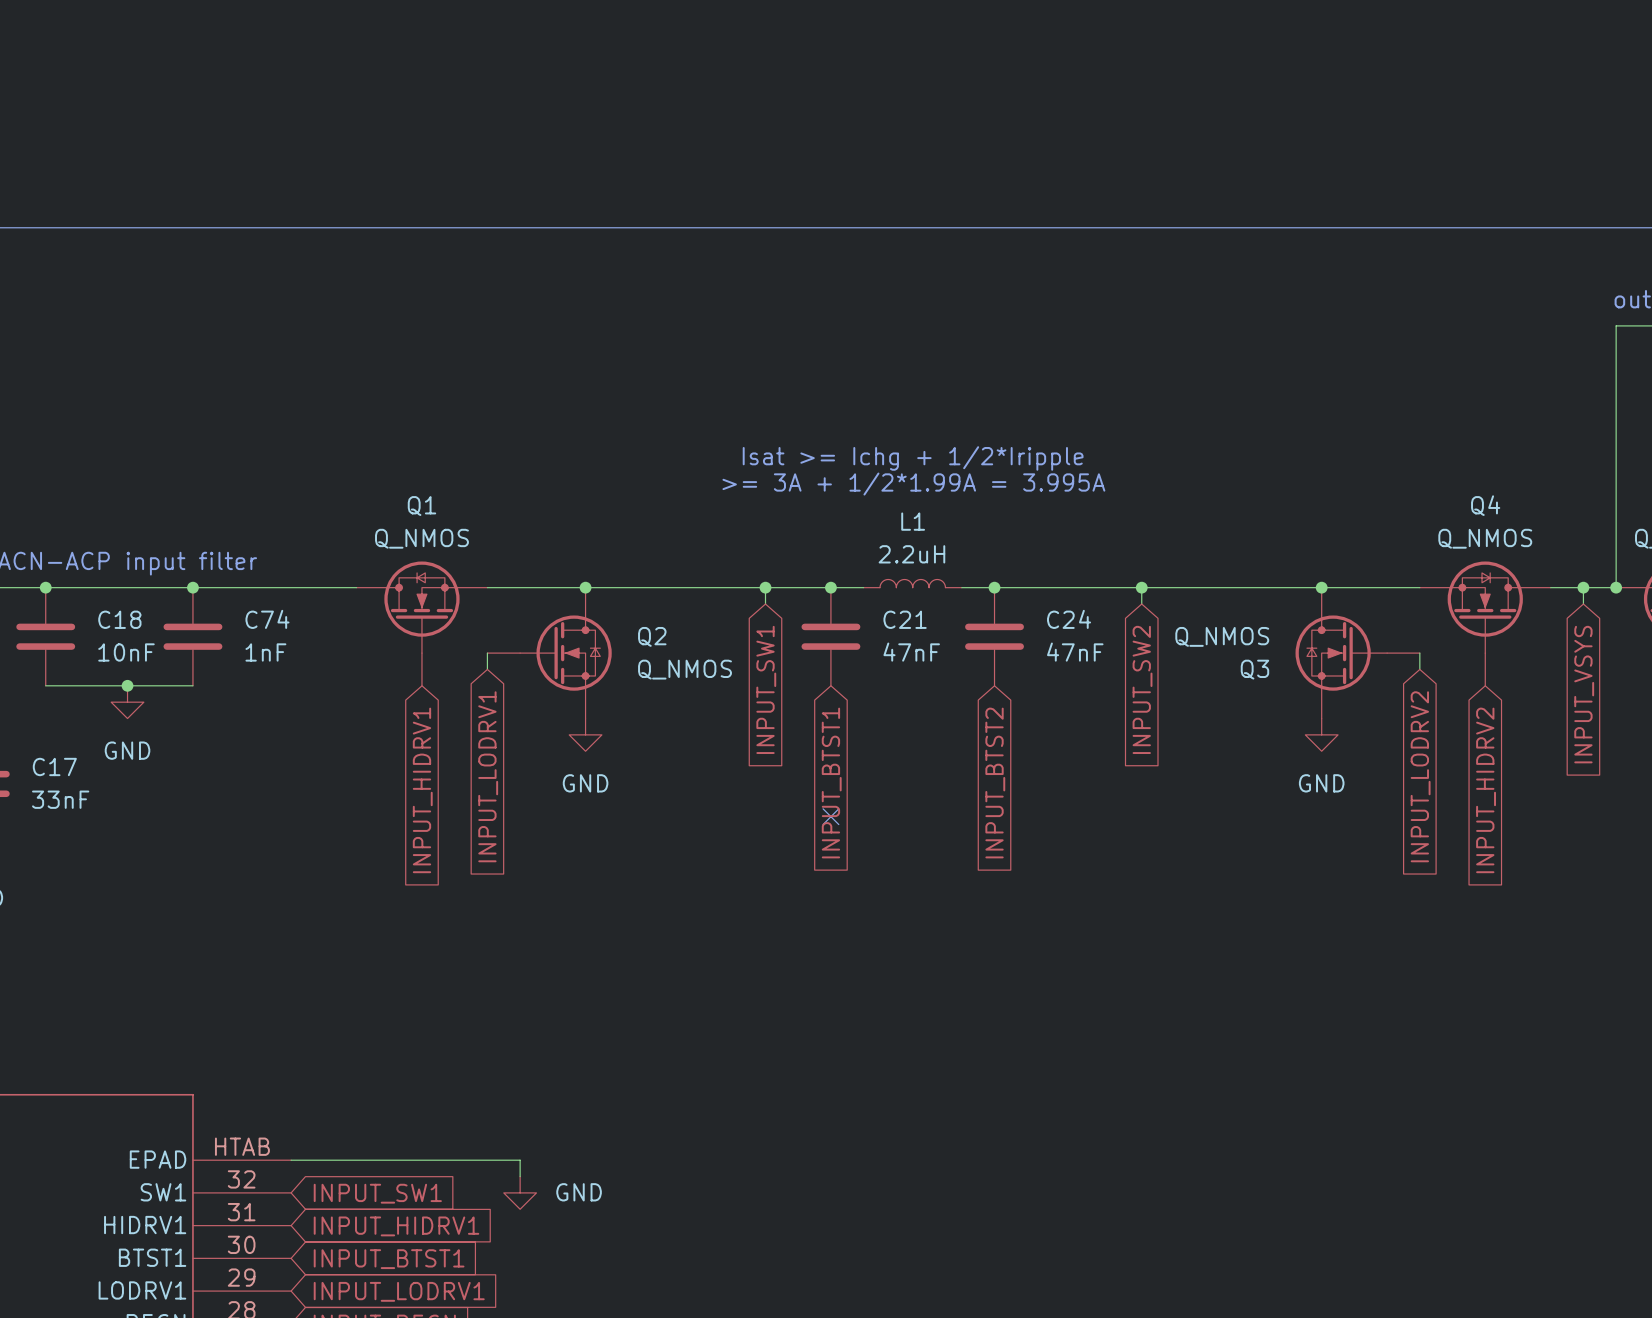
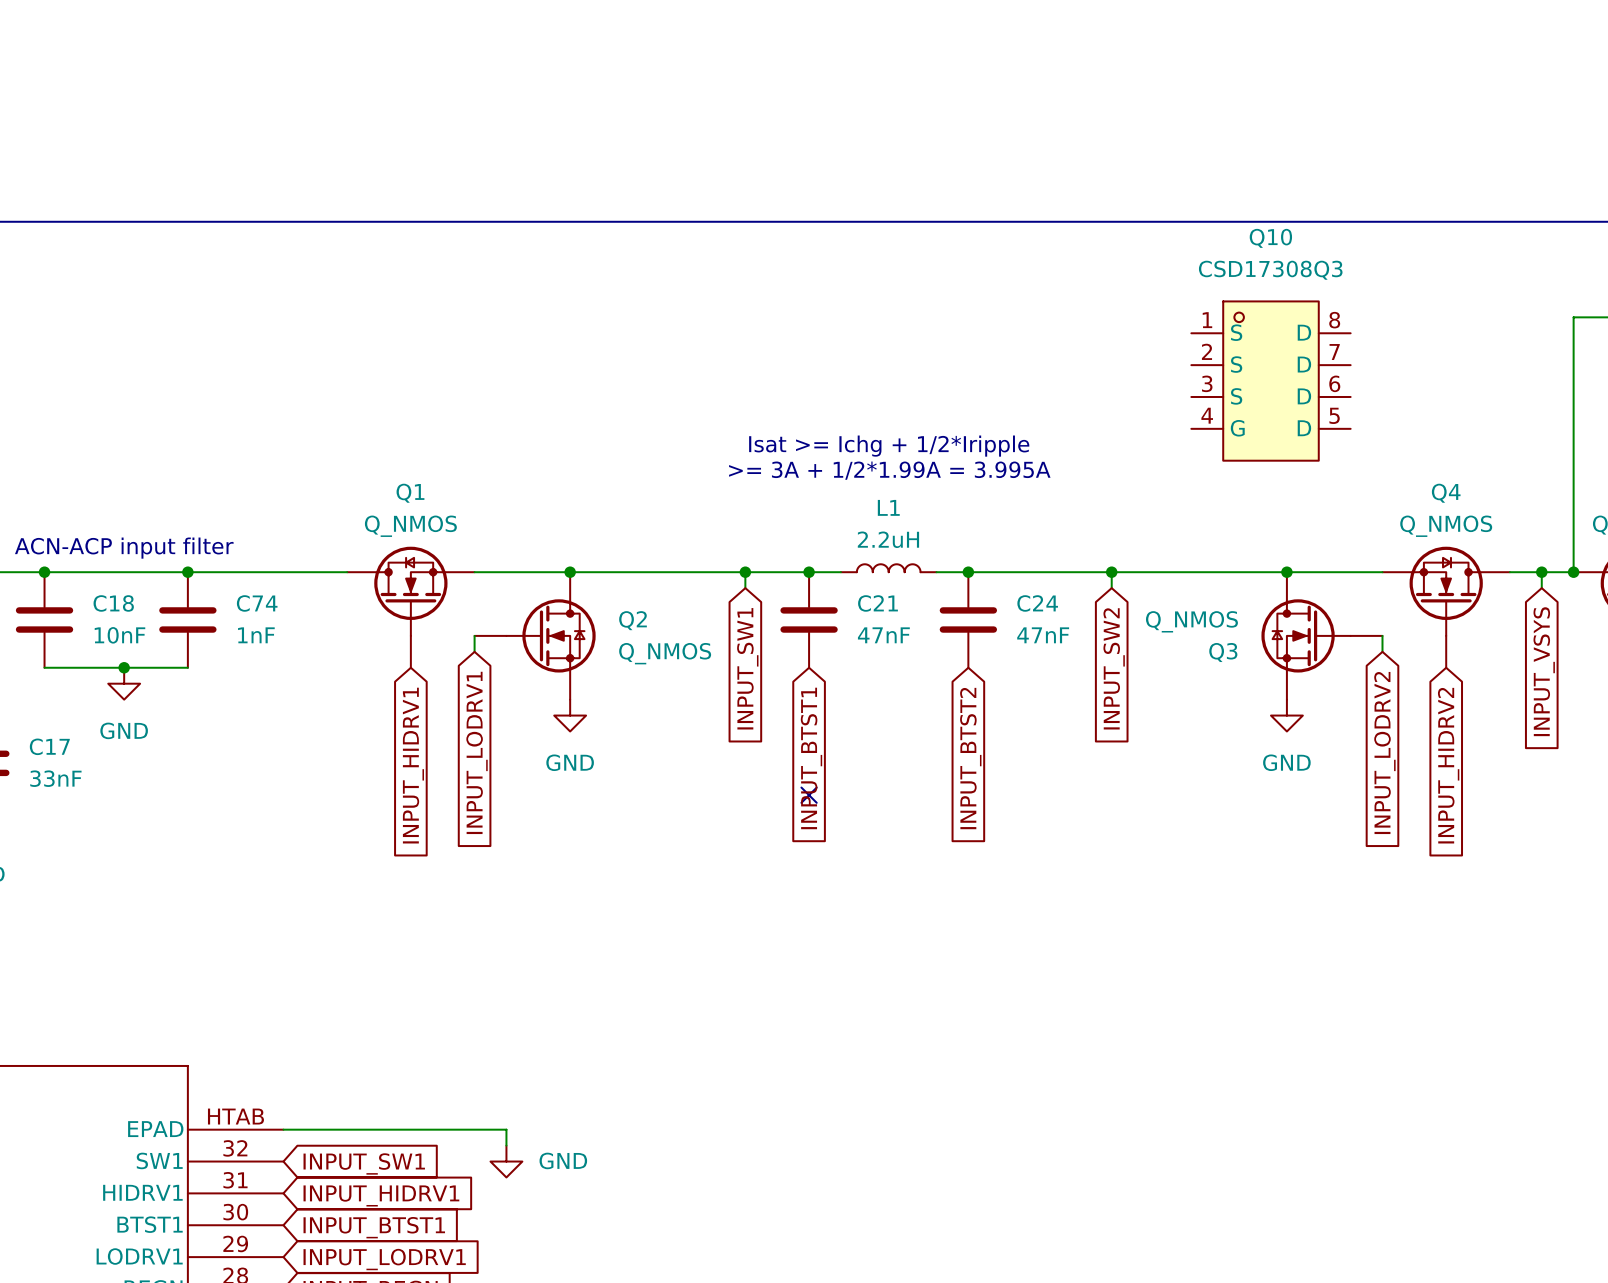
Q10: none -> CSD17308Q3 (1270, 381)

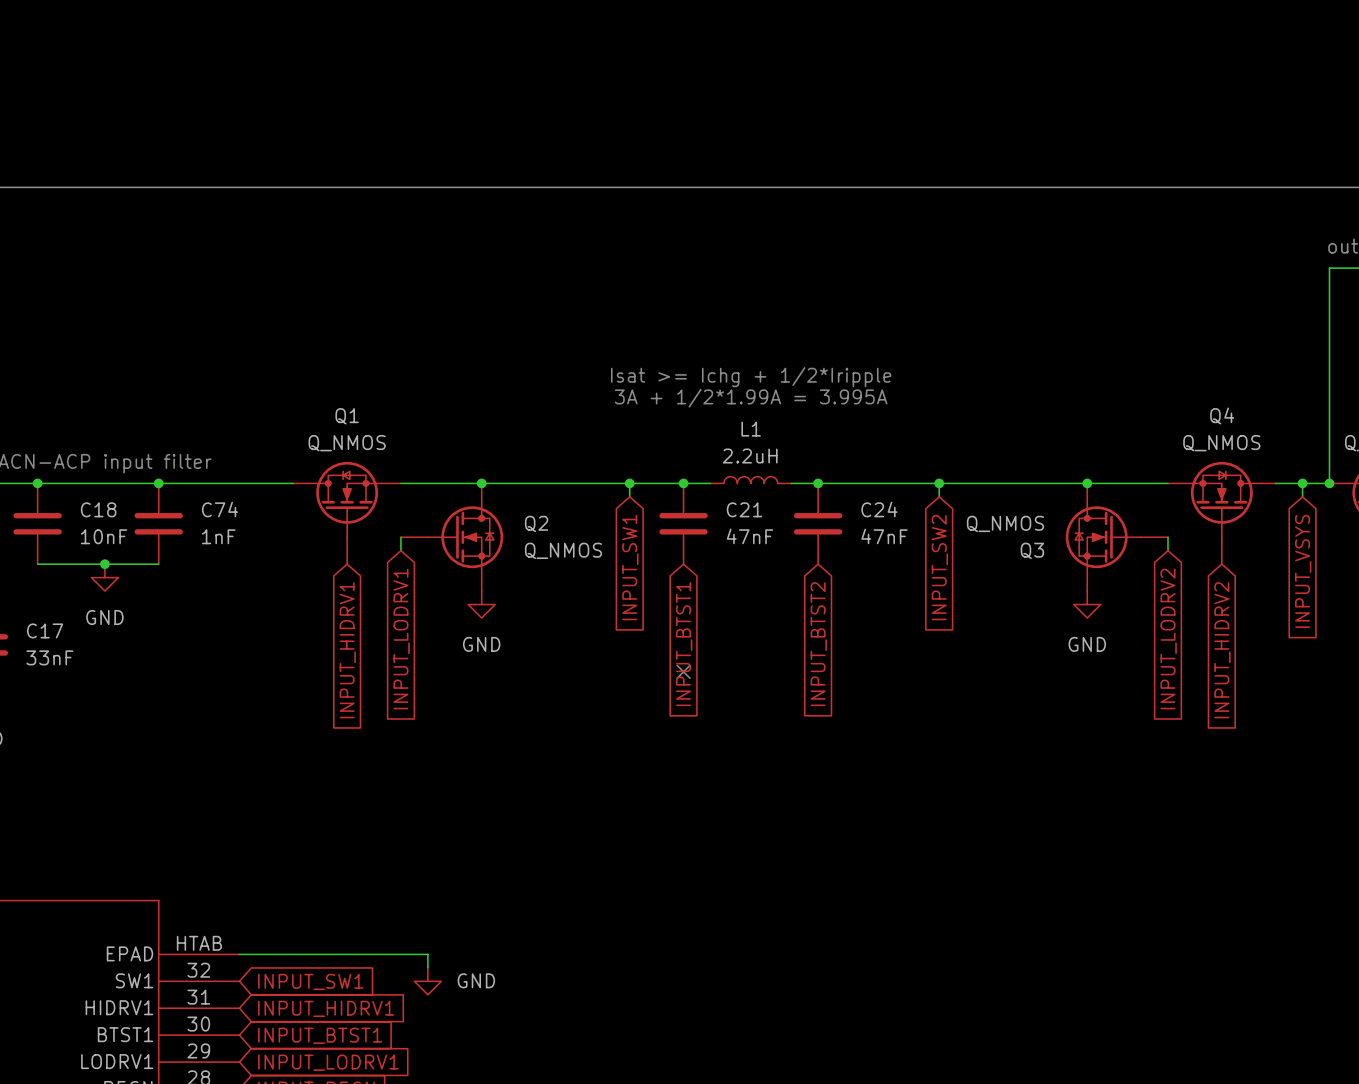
Q10: CSD17308Q3 (1270, 381) -> none
text: >= 3A + 1/2*1.99A = 3.995A (889, 470) -> 3A + 1/2*1.99A = 3.995A (751, 398)

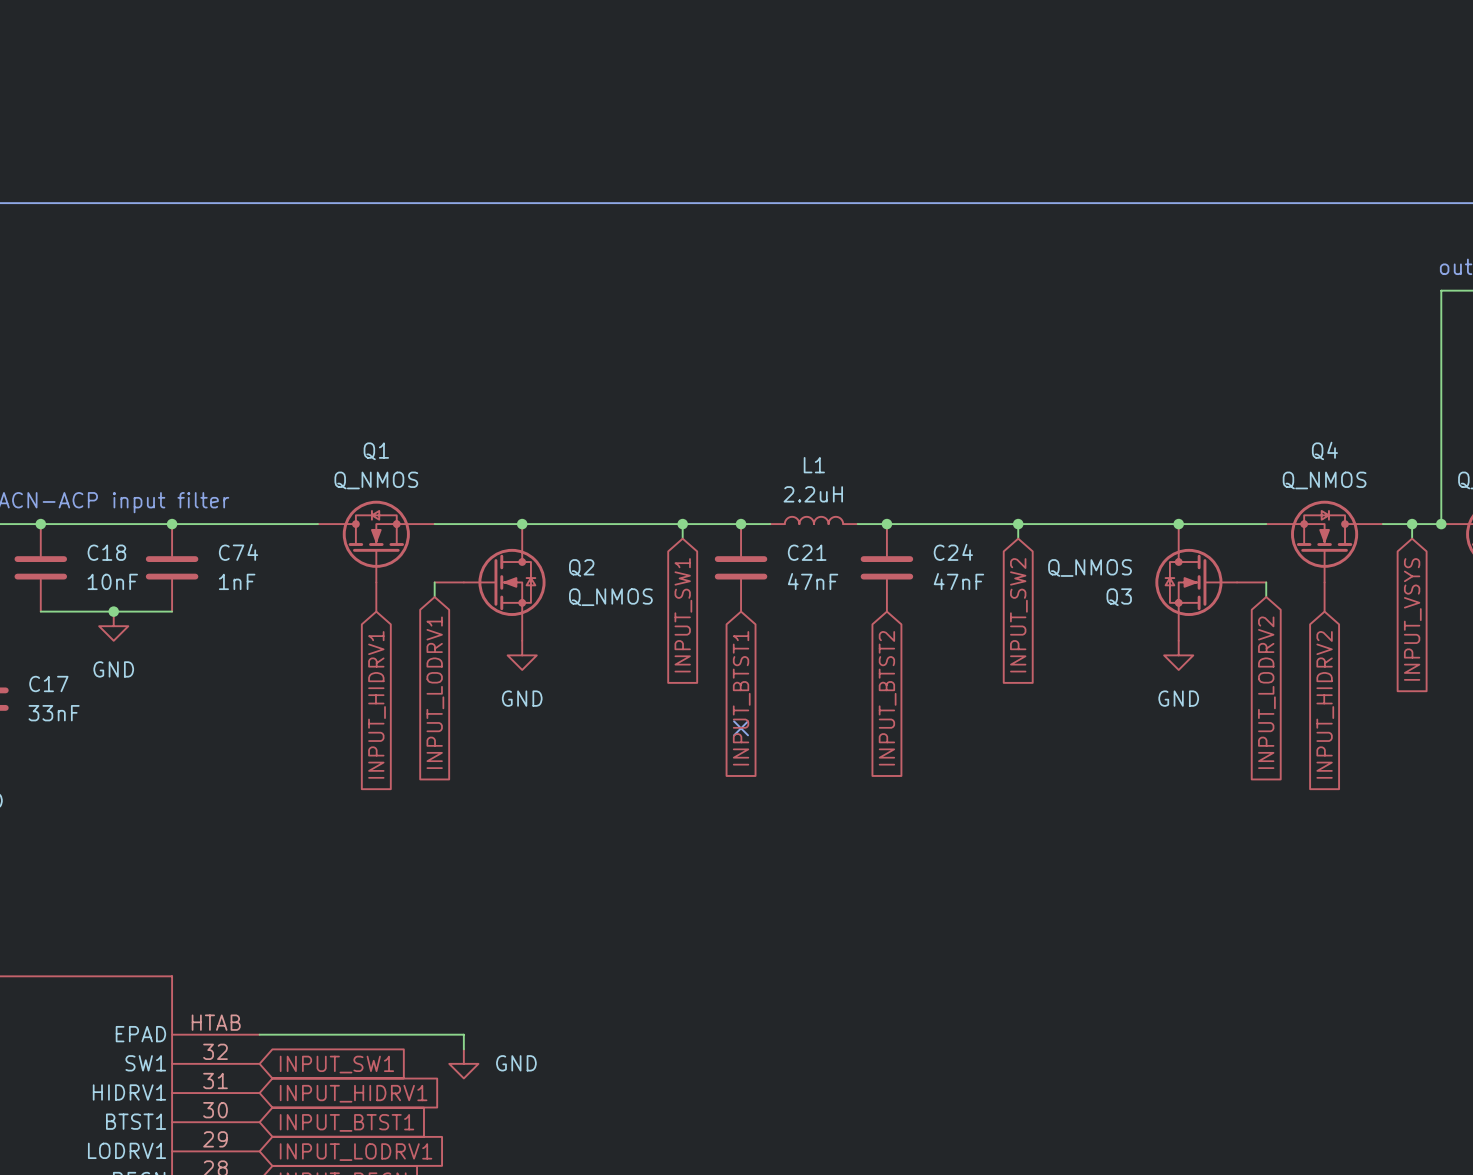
text: Isat >= Ichg + 1/2*Iripple (751, 377) -> none
text: 3A + 1/2*1.99A = 3.995A (751, 398) -> none

